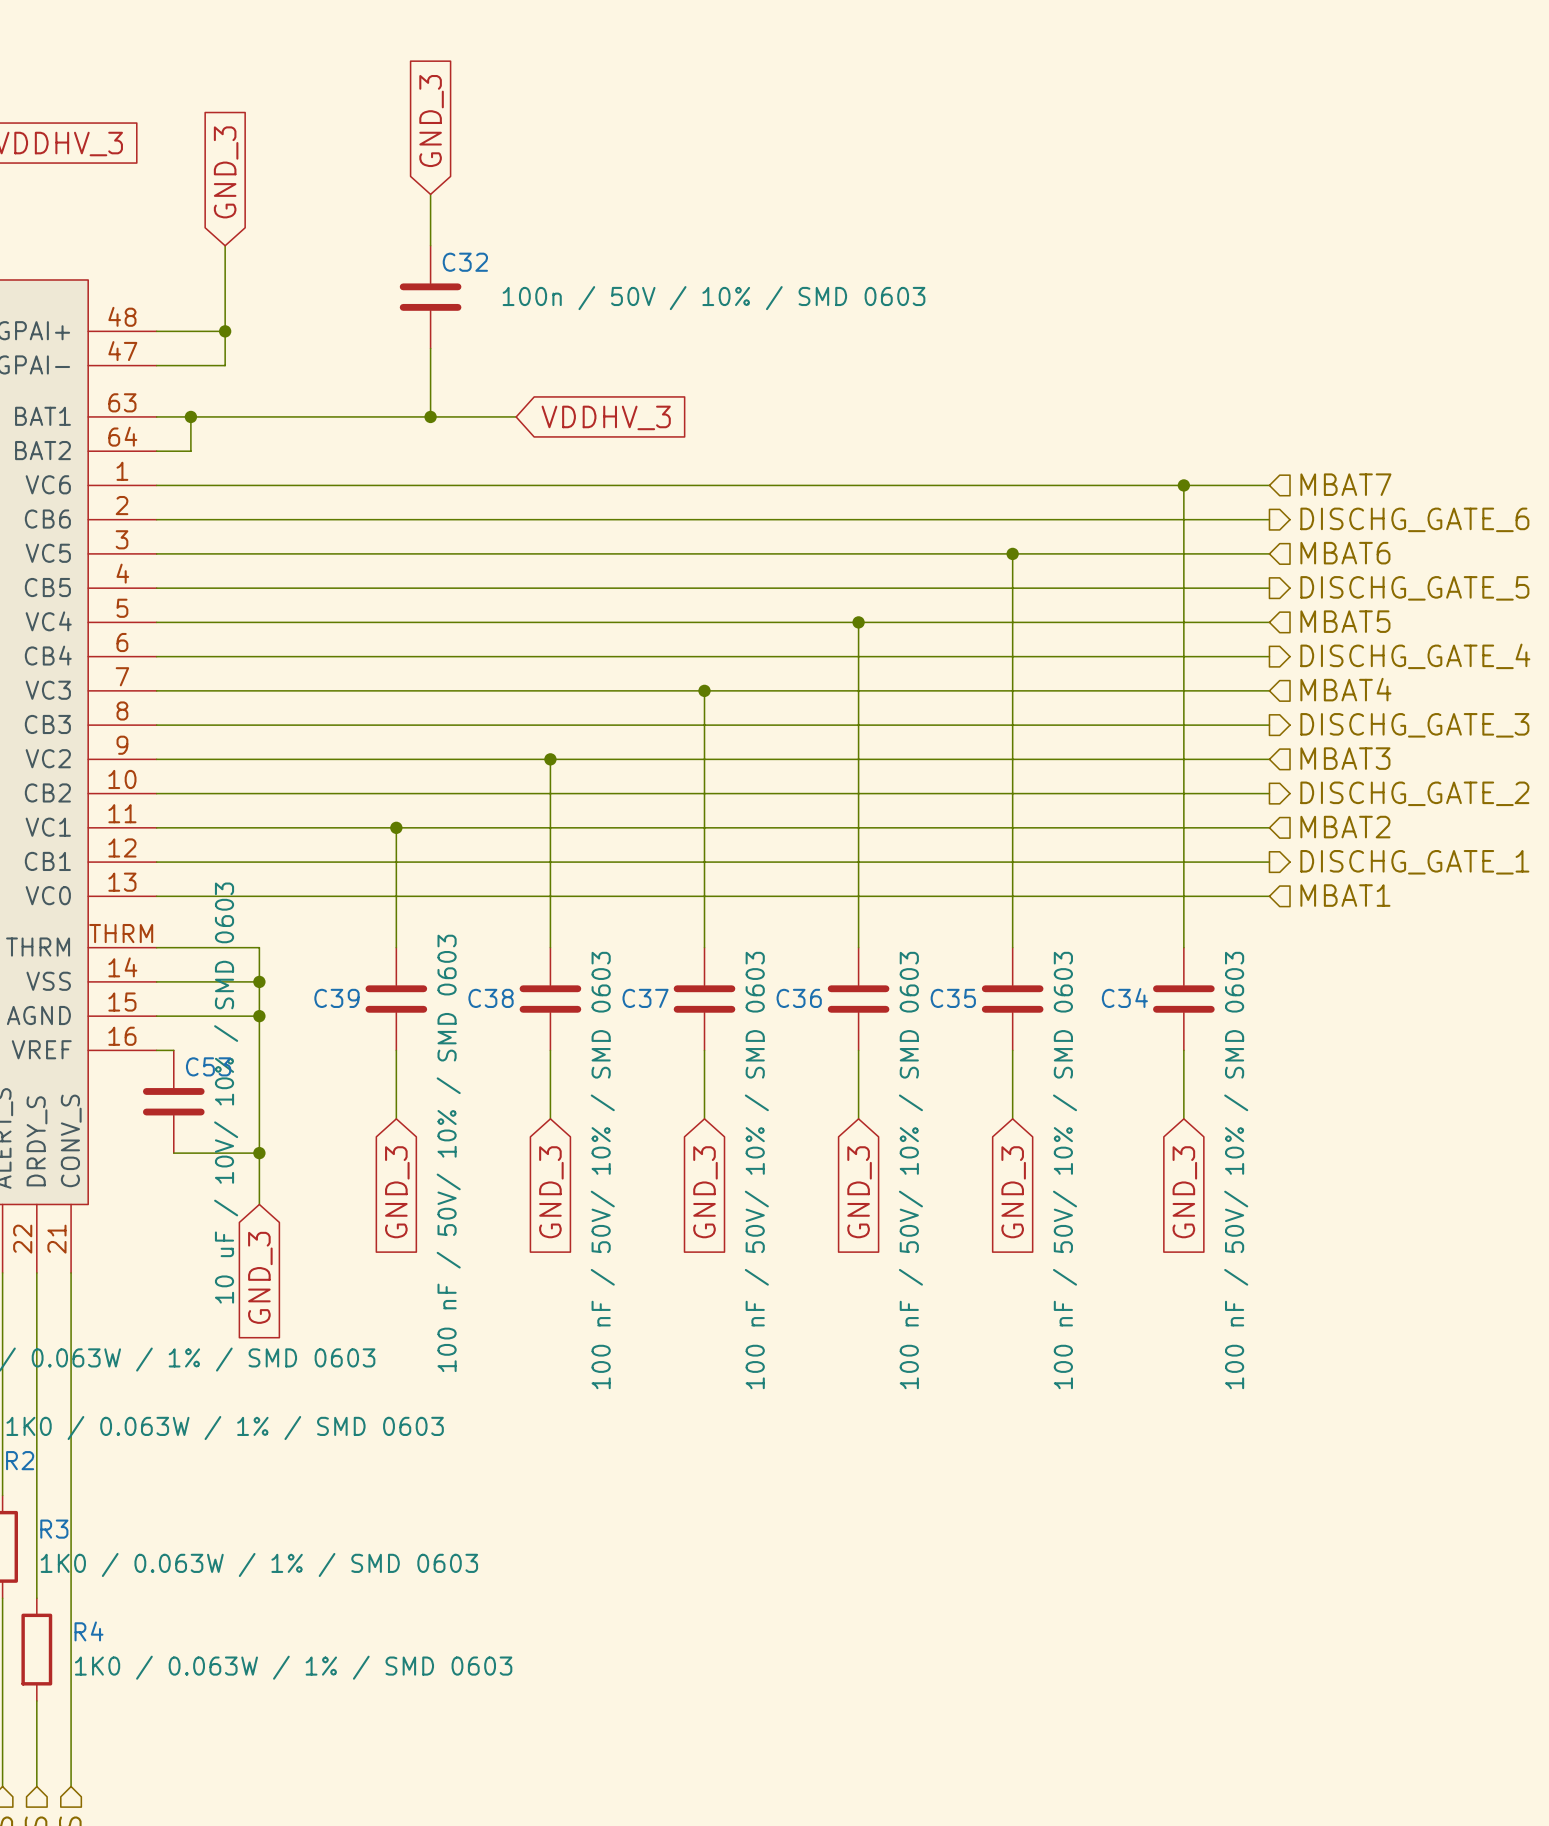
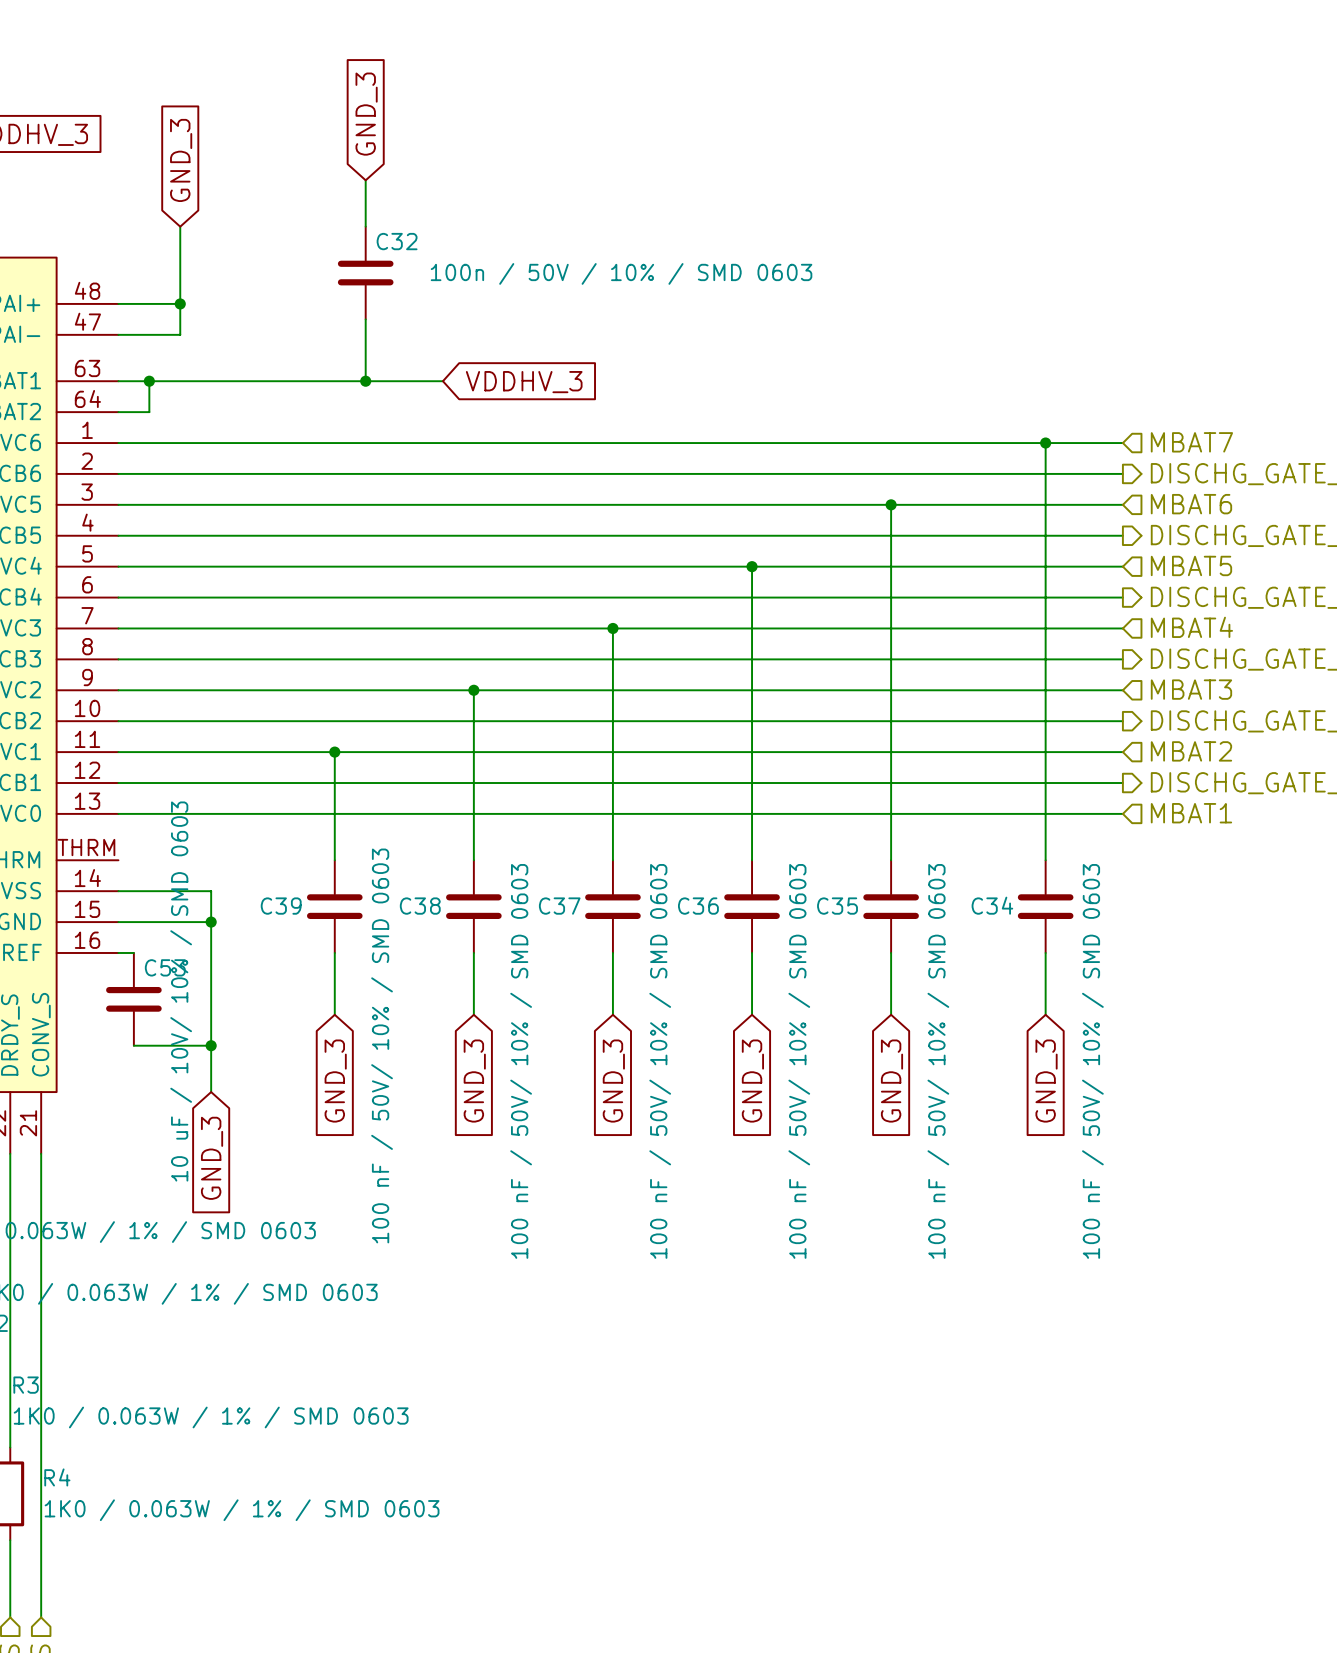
wire: (156, 947) (259, 947) (259, 981) -> none
junction: (259, 981) -> none

